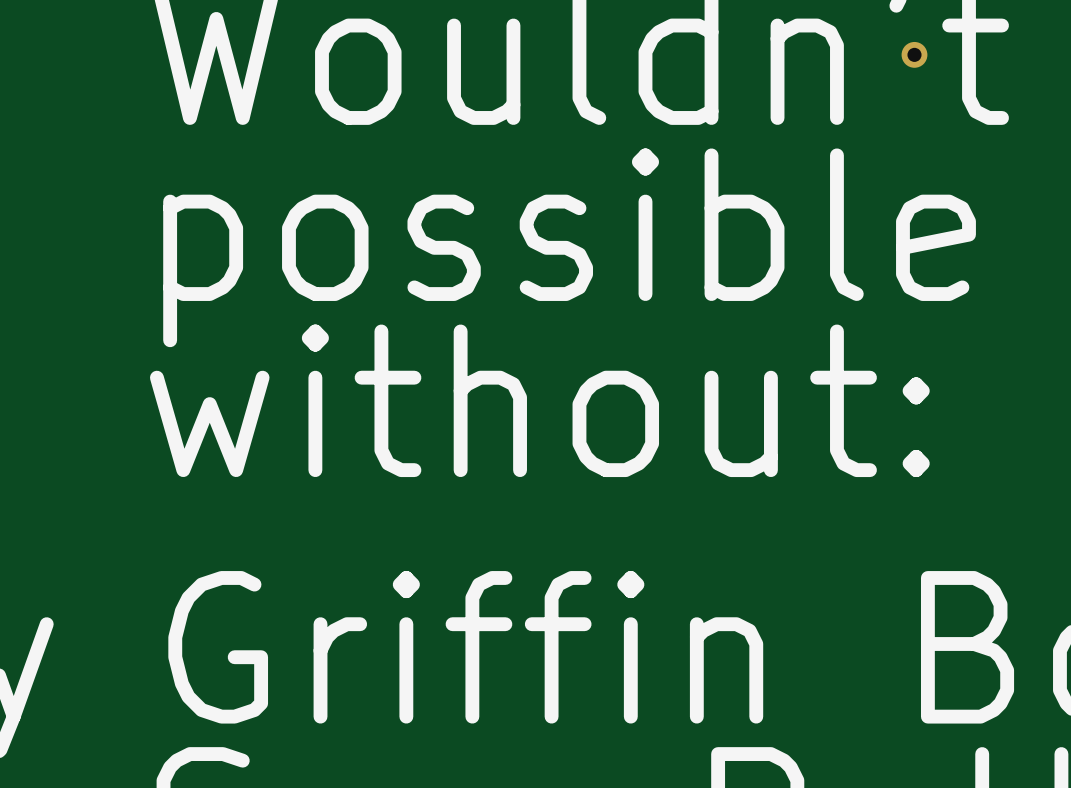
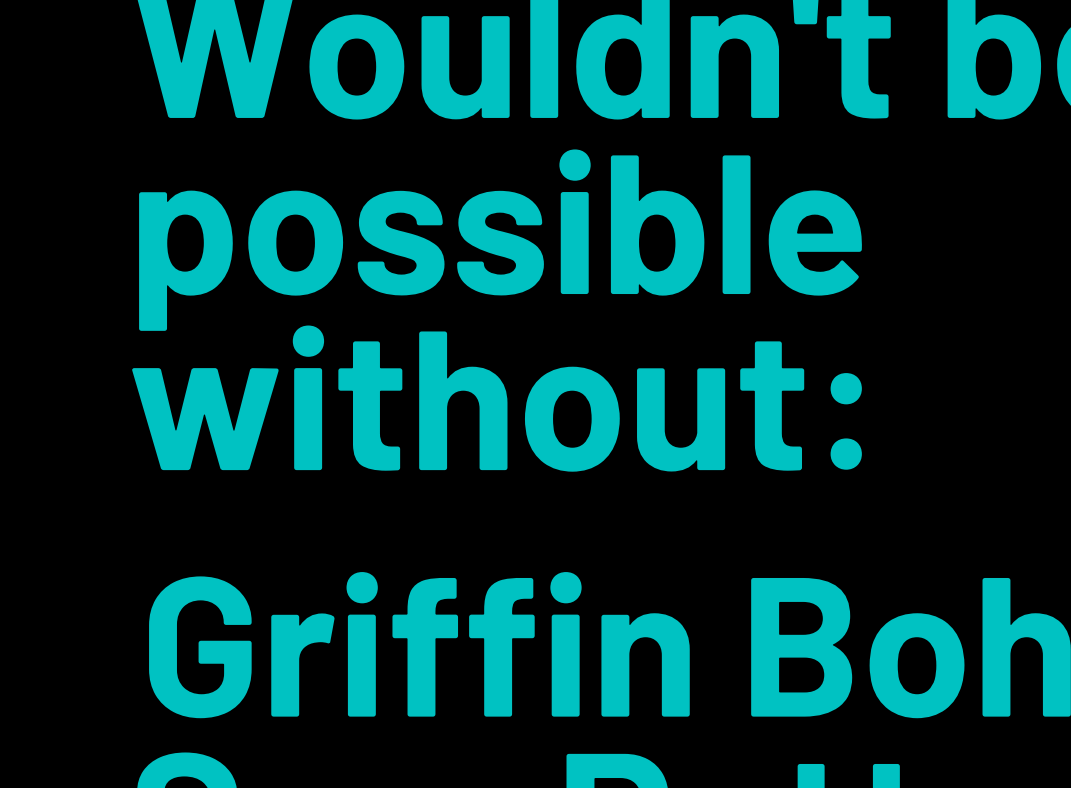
via: (914, 54) -> none

